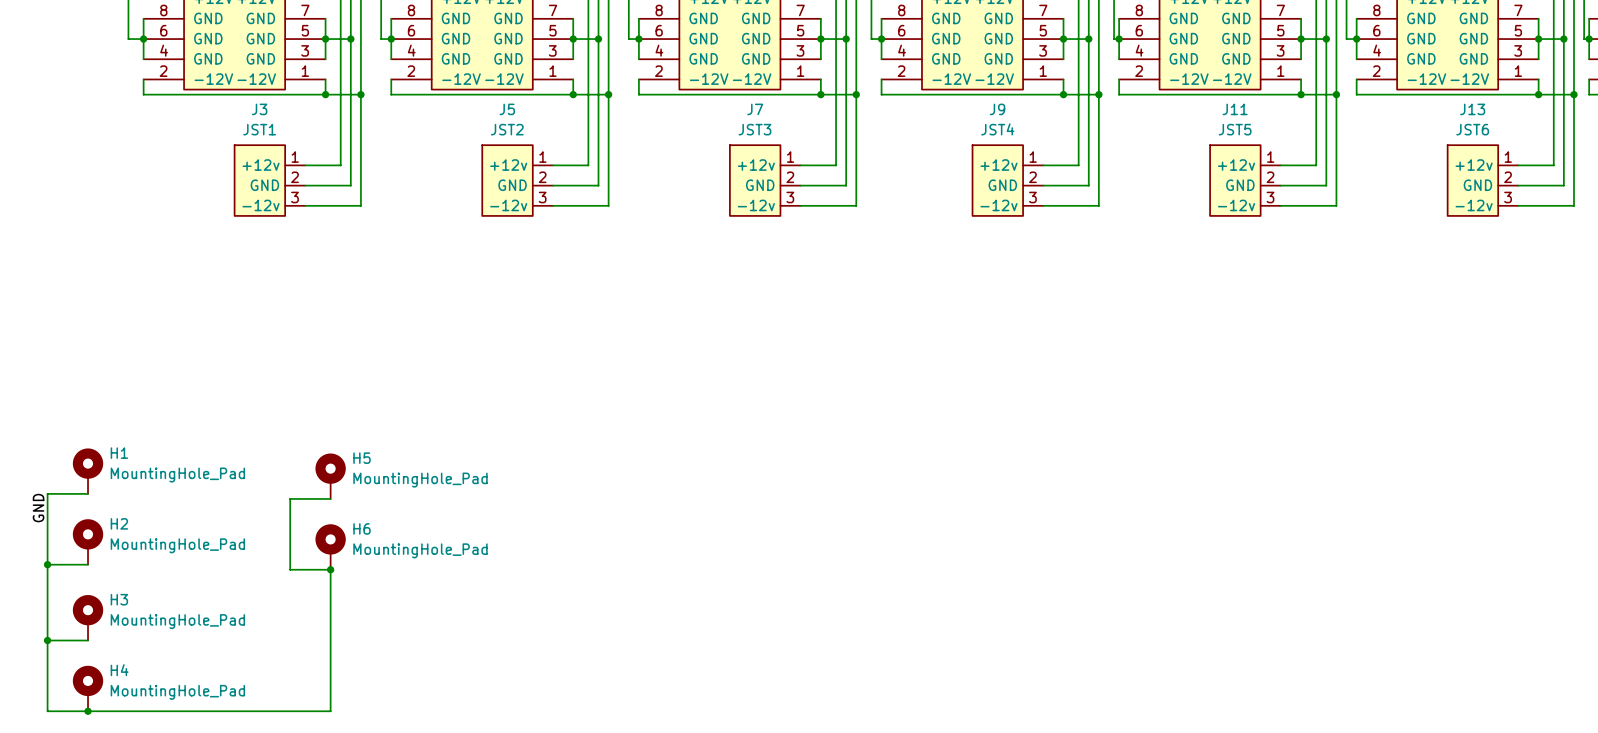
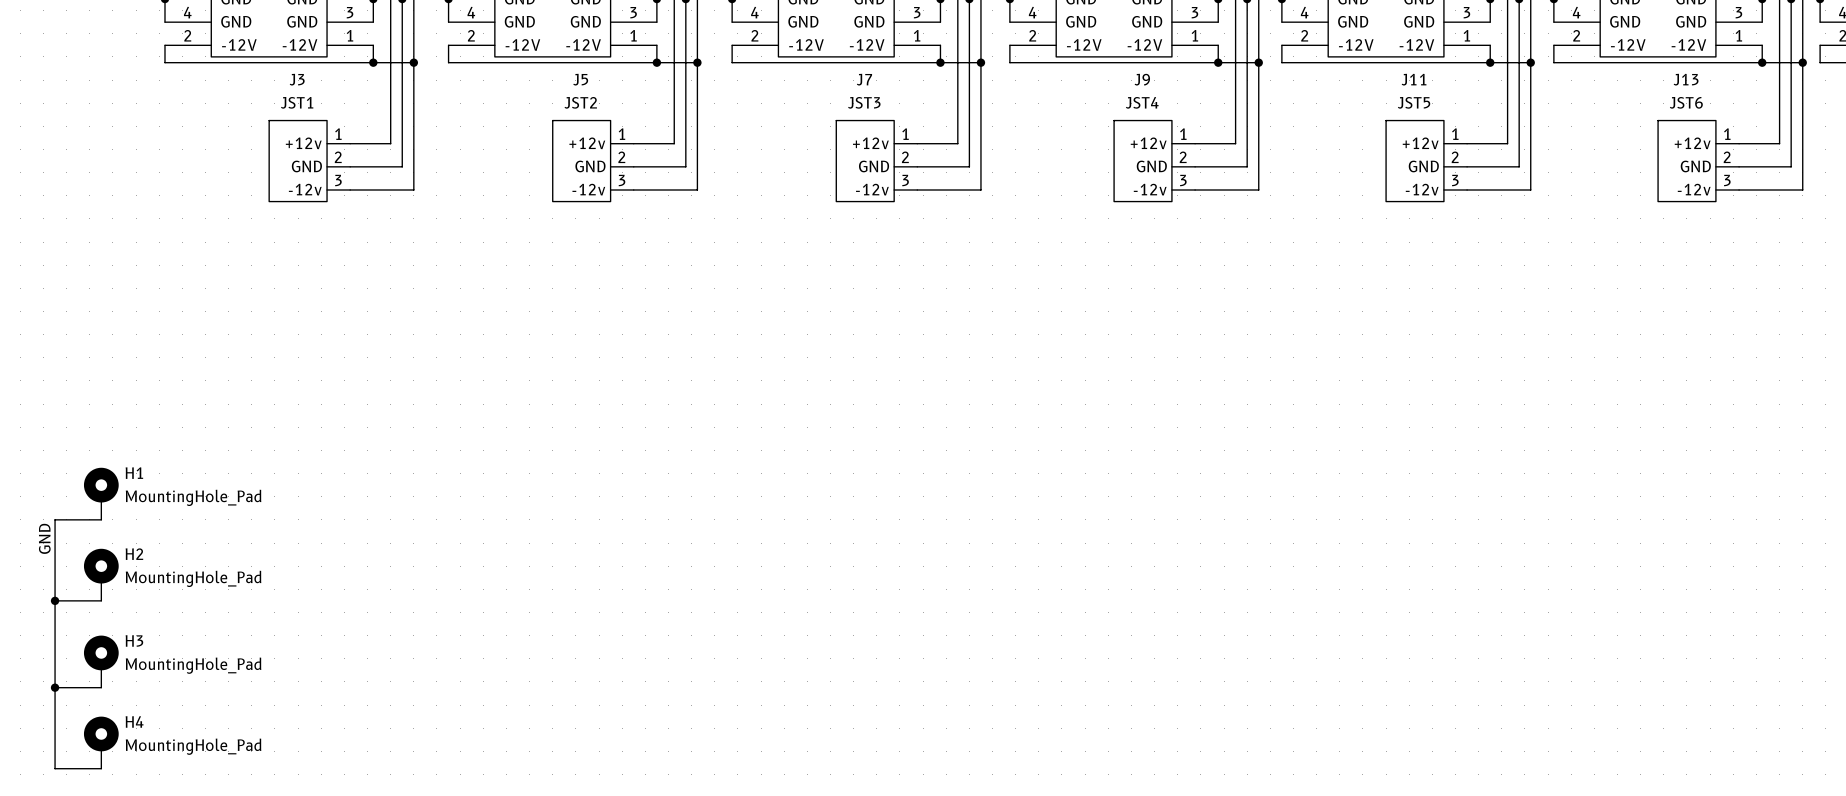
H5: MountingHole_Pad (330, 476) -> none
wire: (330, 498) (290, 498) (290, 569) (330, 569) (330, 711) (88, 711) -> none
H6: MountingHole_Pad (330, 547) -> none
junction: (330, 569) -> none
junction: (88, 711) -> none

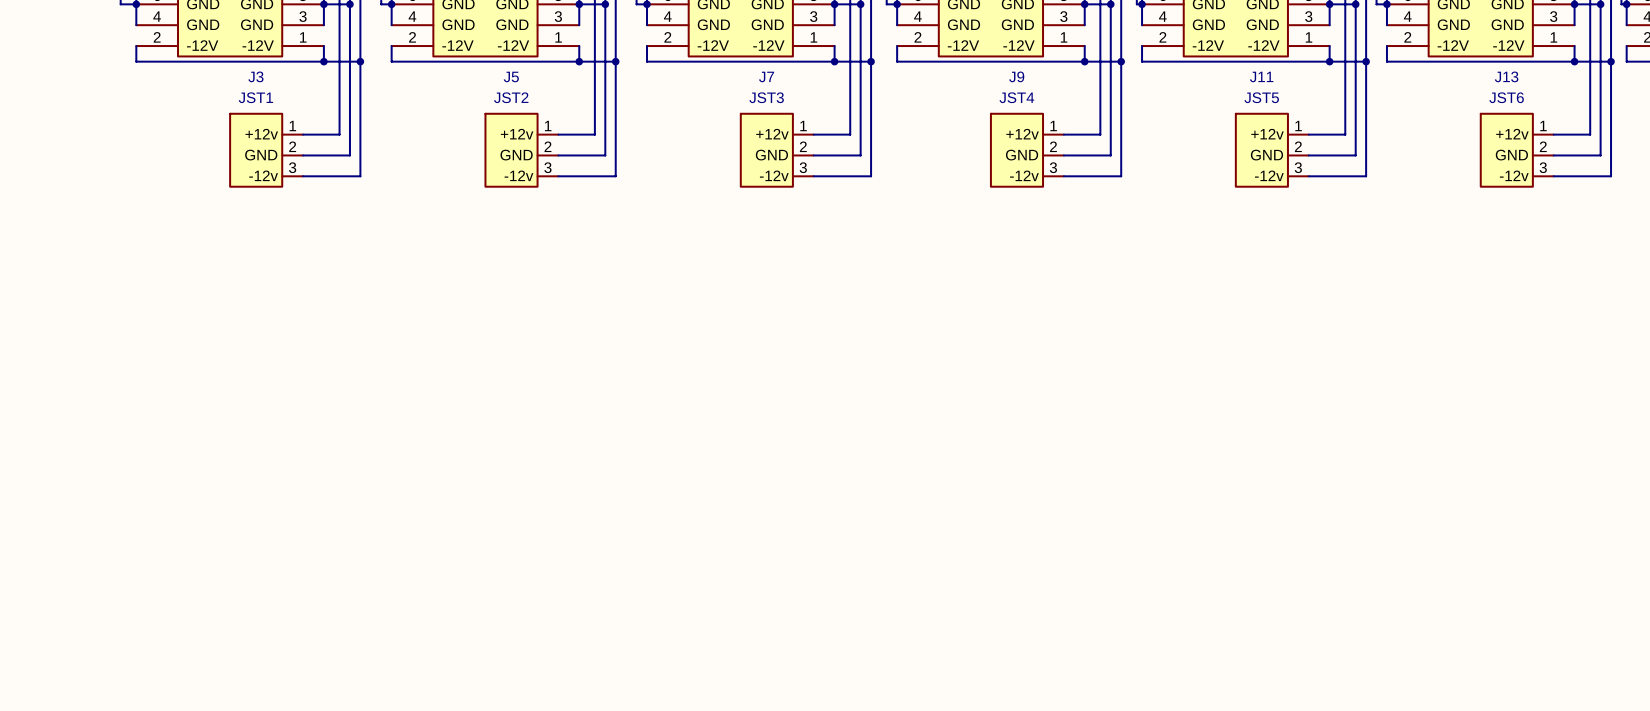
H1: MountingHole_Pad (101, 493) -> none
wire: (101, 519) (55, 519) (55, 768) (101, 768) -> none
label: GND (44, 538) -> none
H2: MountingHole_Pad (101, 574) -> none
wire: (55, 600) (101, 600) -> none
junction: (55, 600) -> none
H3: MountingHole_Pad (101, 661) -> none
wire: (55, 687) (101, 687) -> none
junction: (55, 687) -> none
H4: MountingHole_Pad (101, 742) -> none

